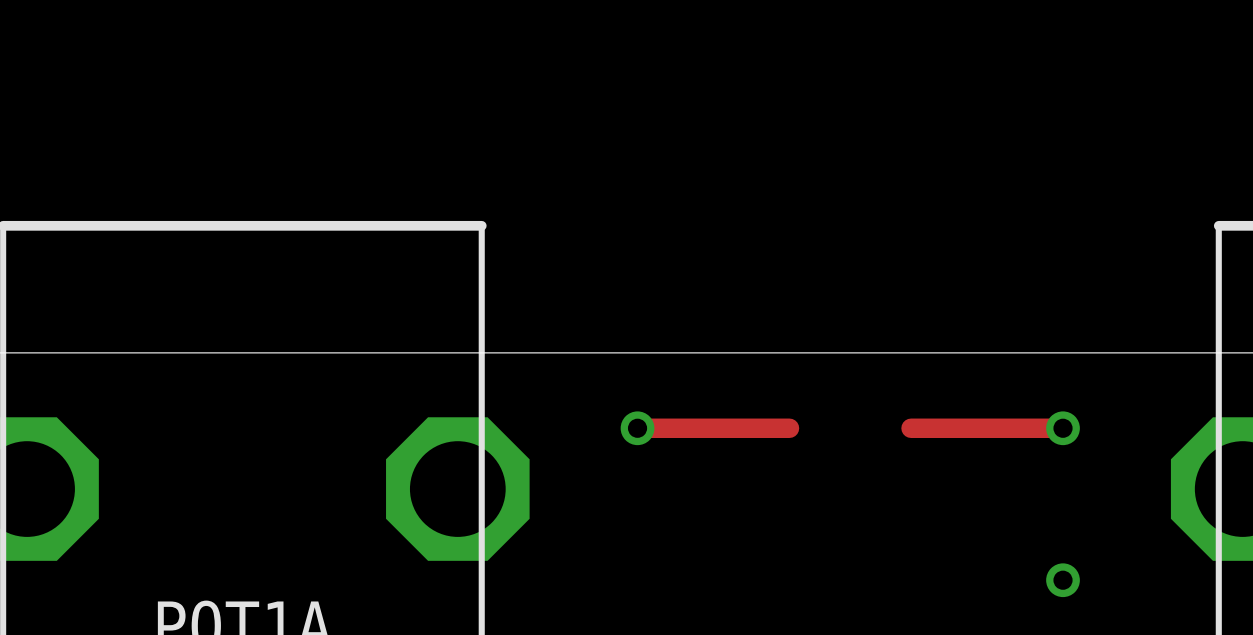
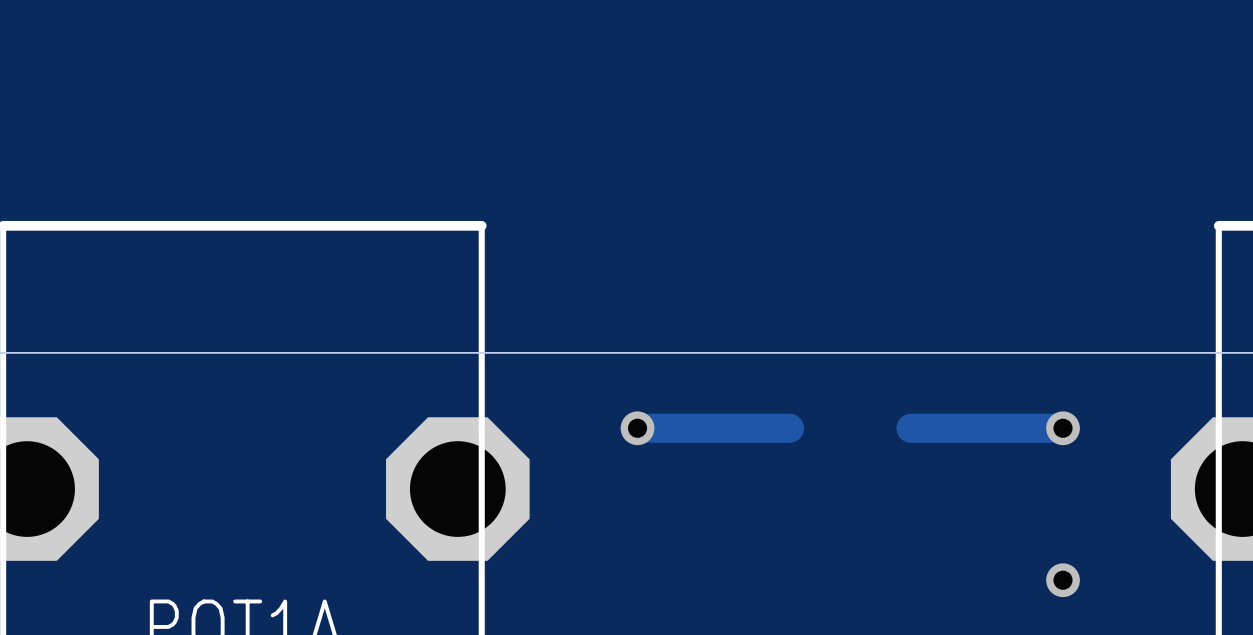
track width: thin (637, 428) (789, 428) -> thick (637, 428) (789, 428)
track width: thin (911, 428) (1063, 428) -> thick (911, 428) (1063, 428)

